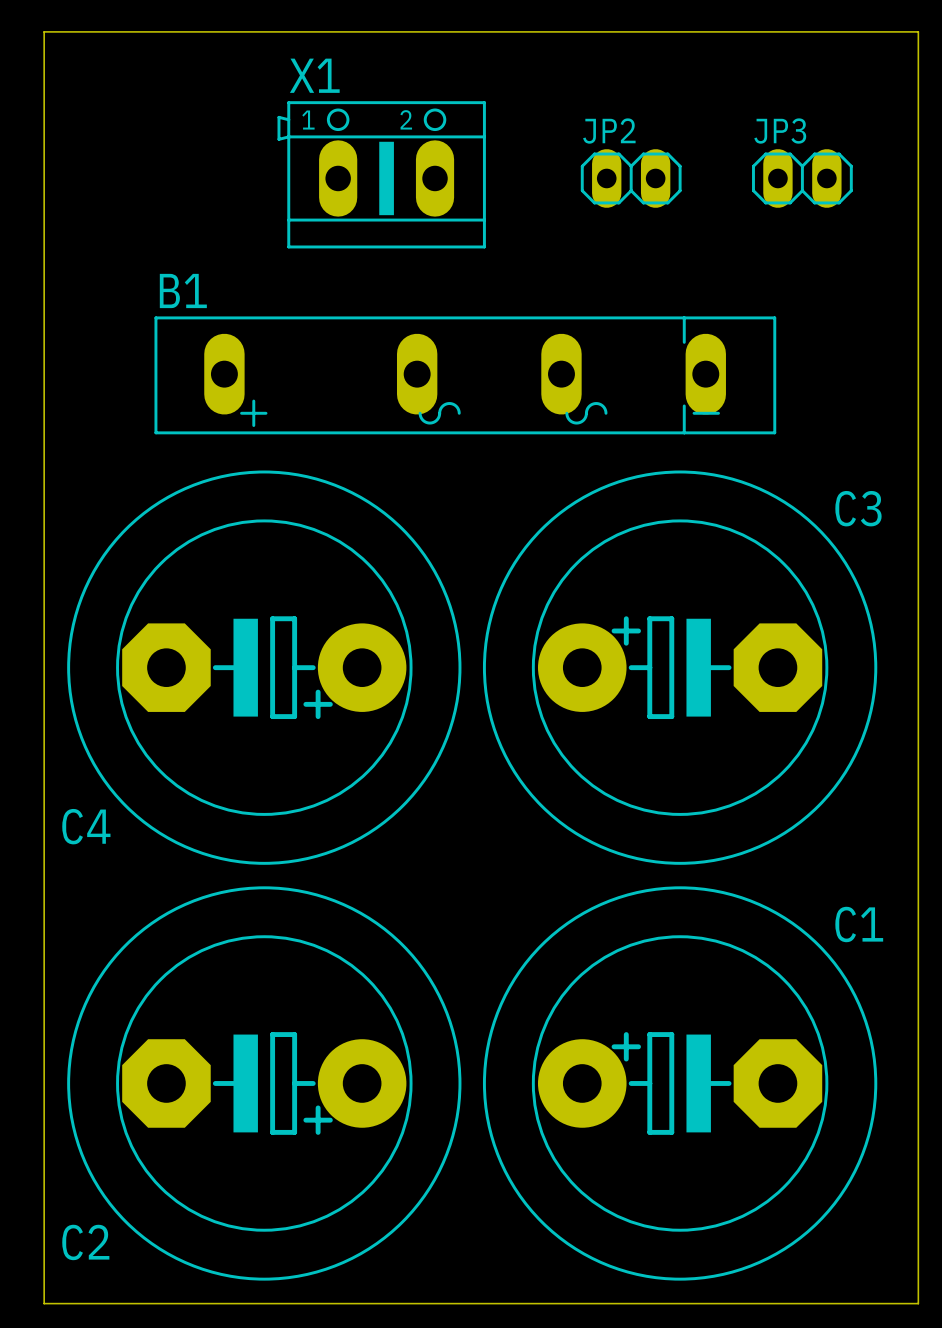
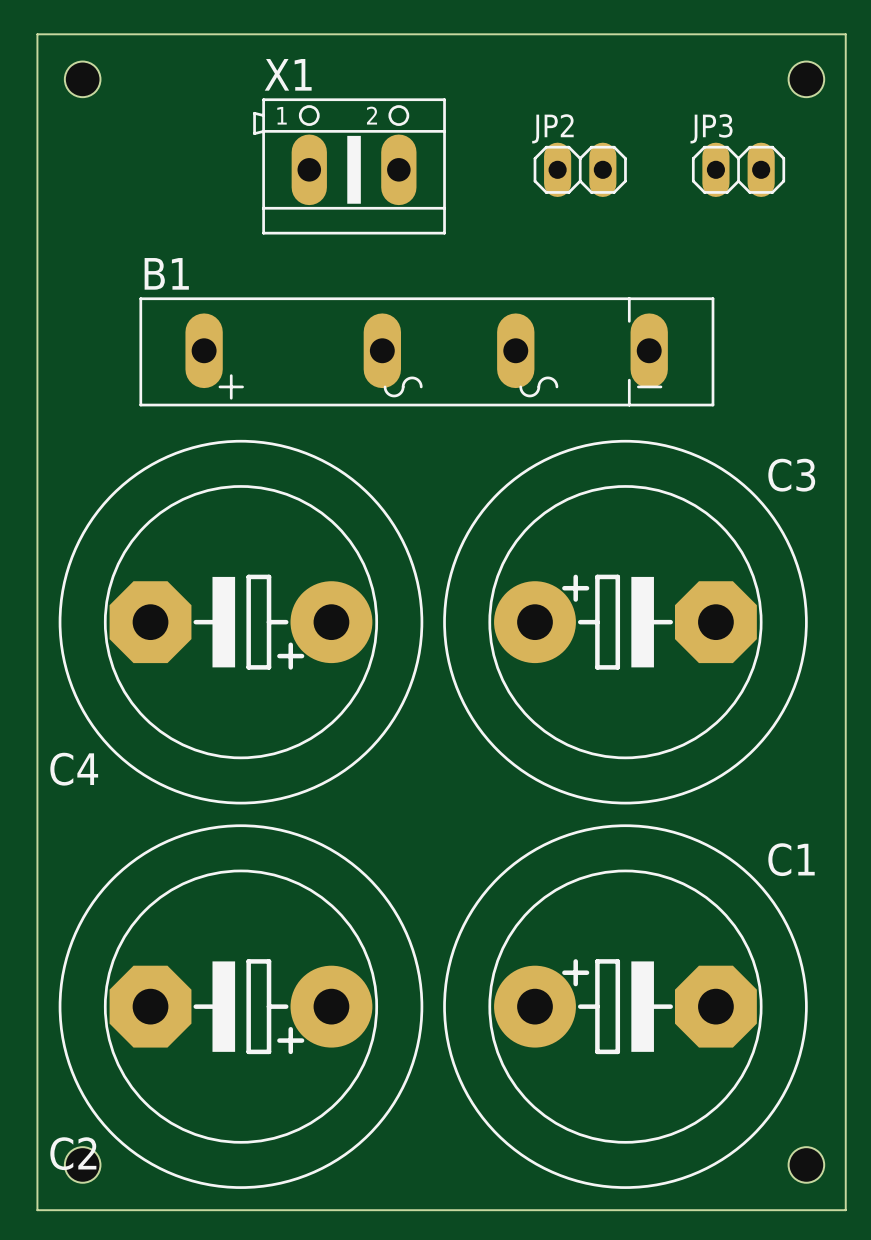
hole: none -> (82, 79)
hole: none -> (806, 79)
hole: none -> (82, 1164)
hole: none -> (806, 1164)

